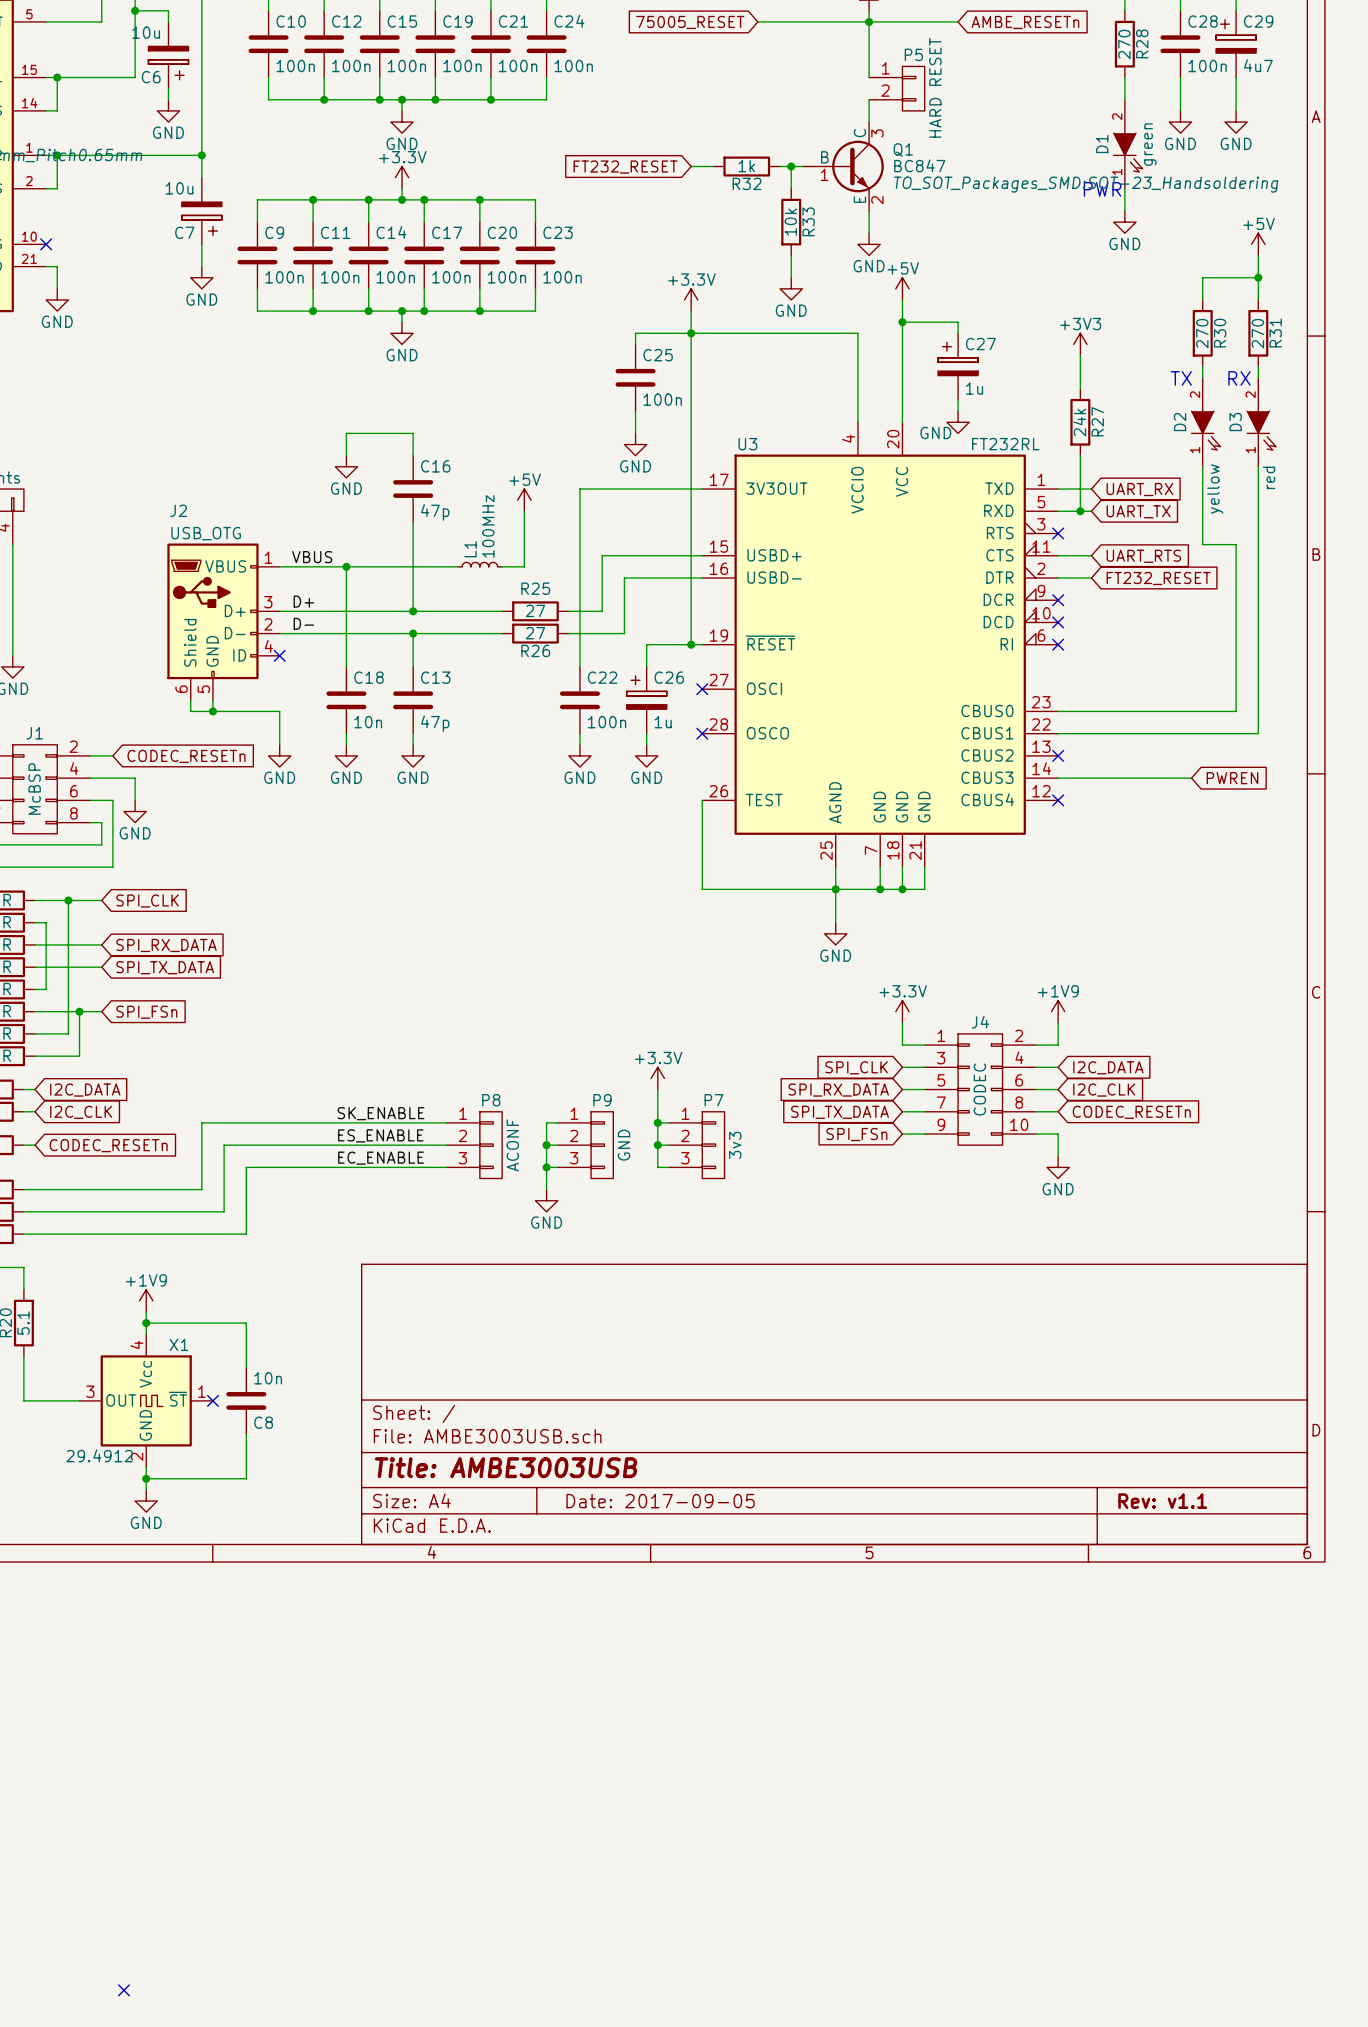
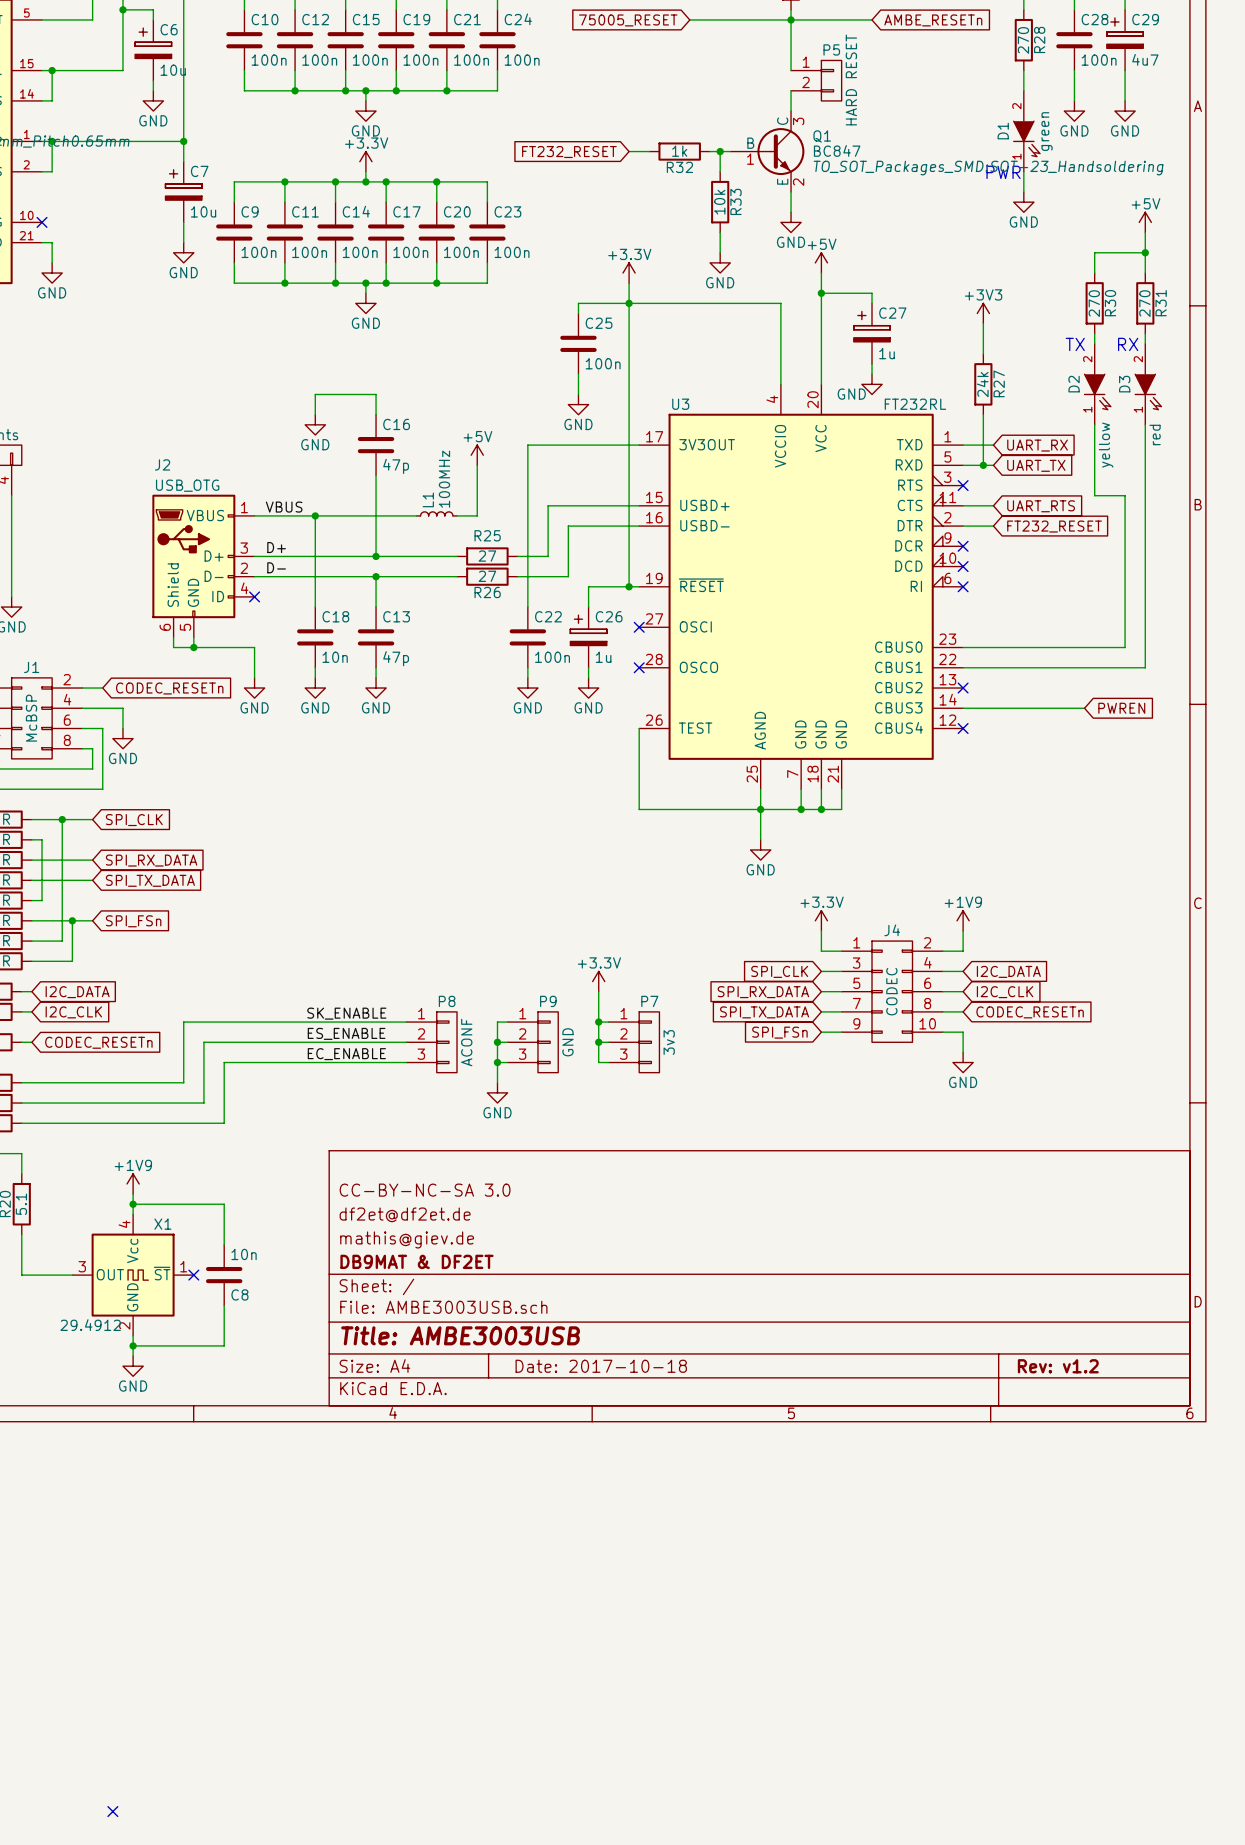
C6 rotation: 0° (168, 63) -> 180° (153, 43)
C7 rotation: 0° (201, 218) -> 180° (183, 184)
title block: none -> CC-BY-NC-SA 3.0 (425, 1190)
title block: none -> df2et@df2et.de (405, 1214)
title block: none -> mathis@giev.de (407, 1239)
title block: none -> DB9MAT & DF2ET (417, 1261)
title block: Date: 2017-09-05 (660, 1501) -> Date: 2017-10-18 (601, 1366)
title block: Rev: v1.1 (1162, 1501) -> Rev: v1.2 (1058, 1366)

